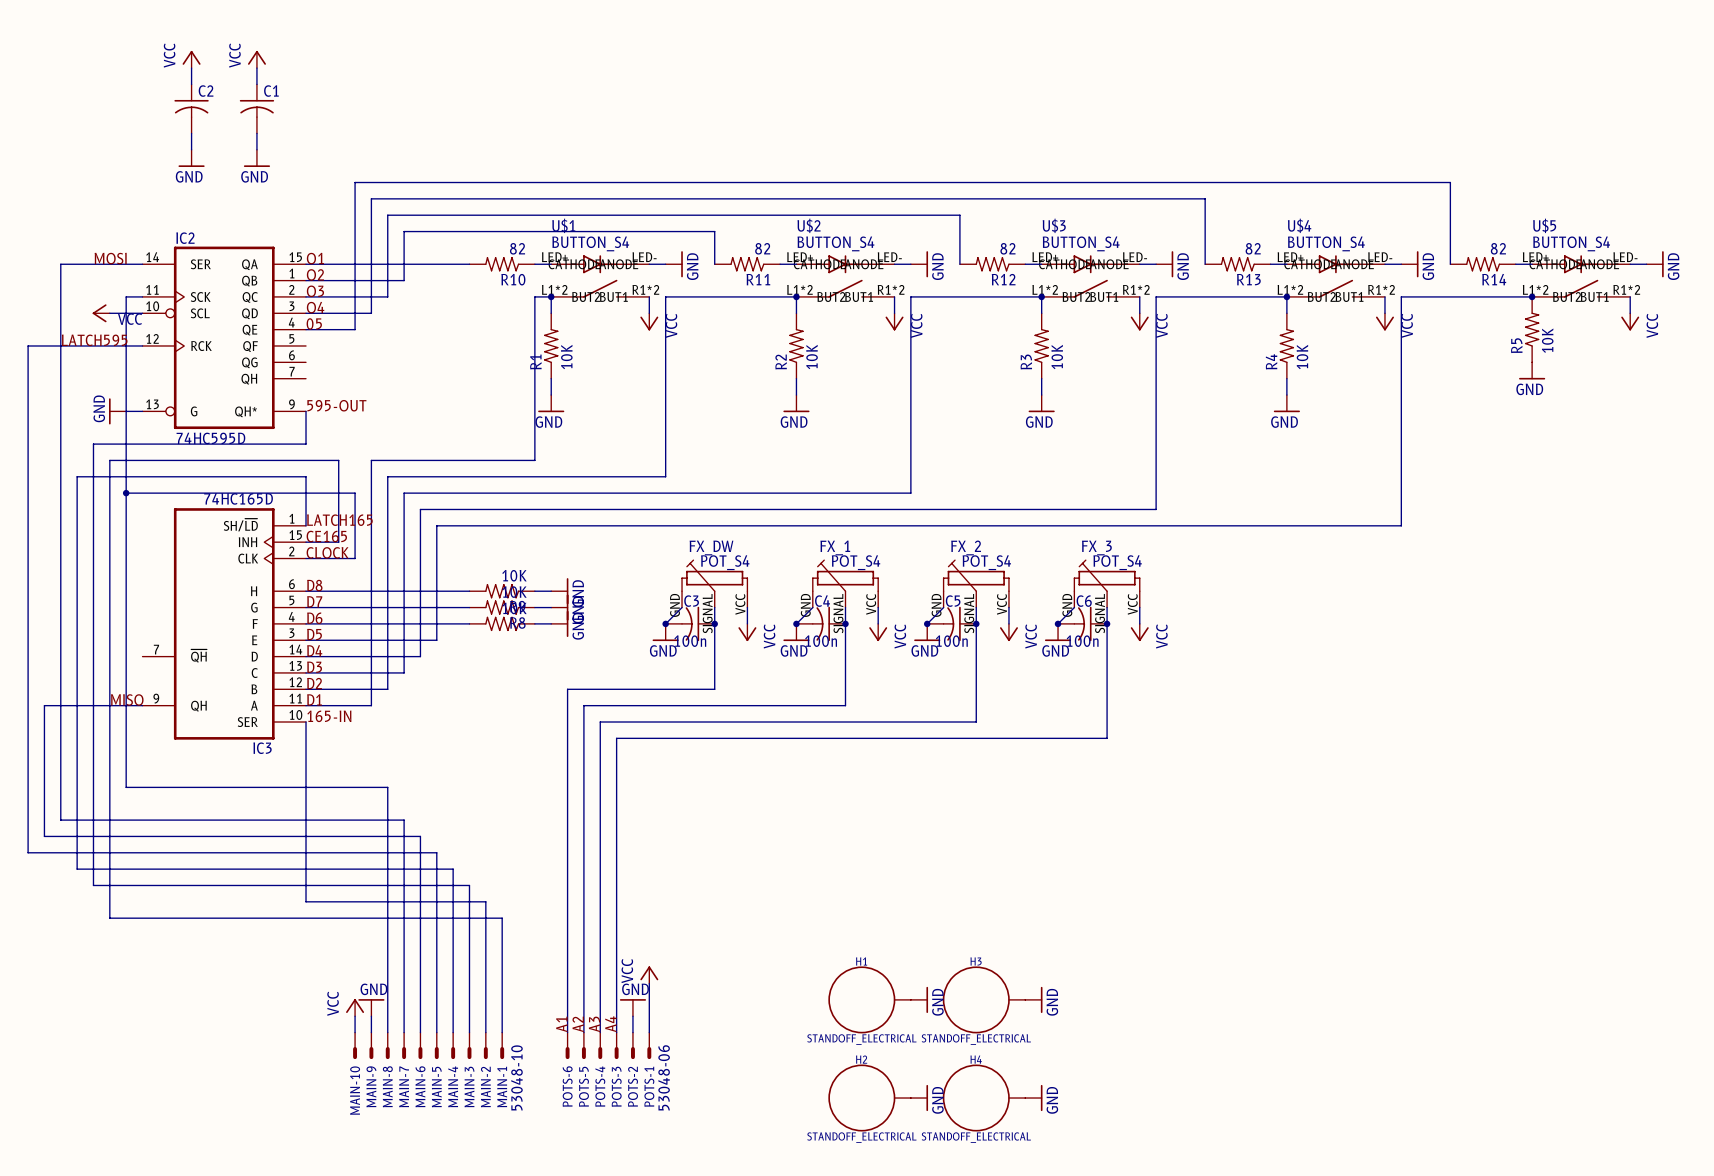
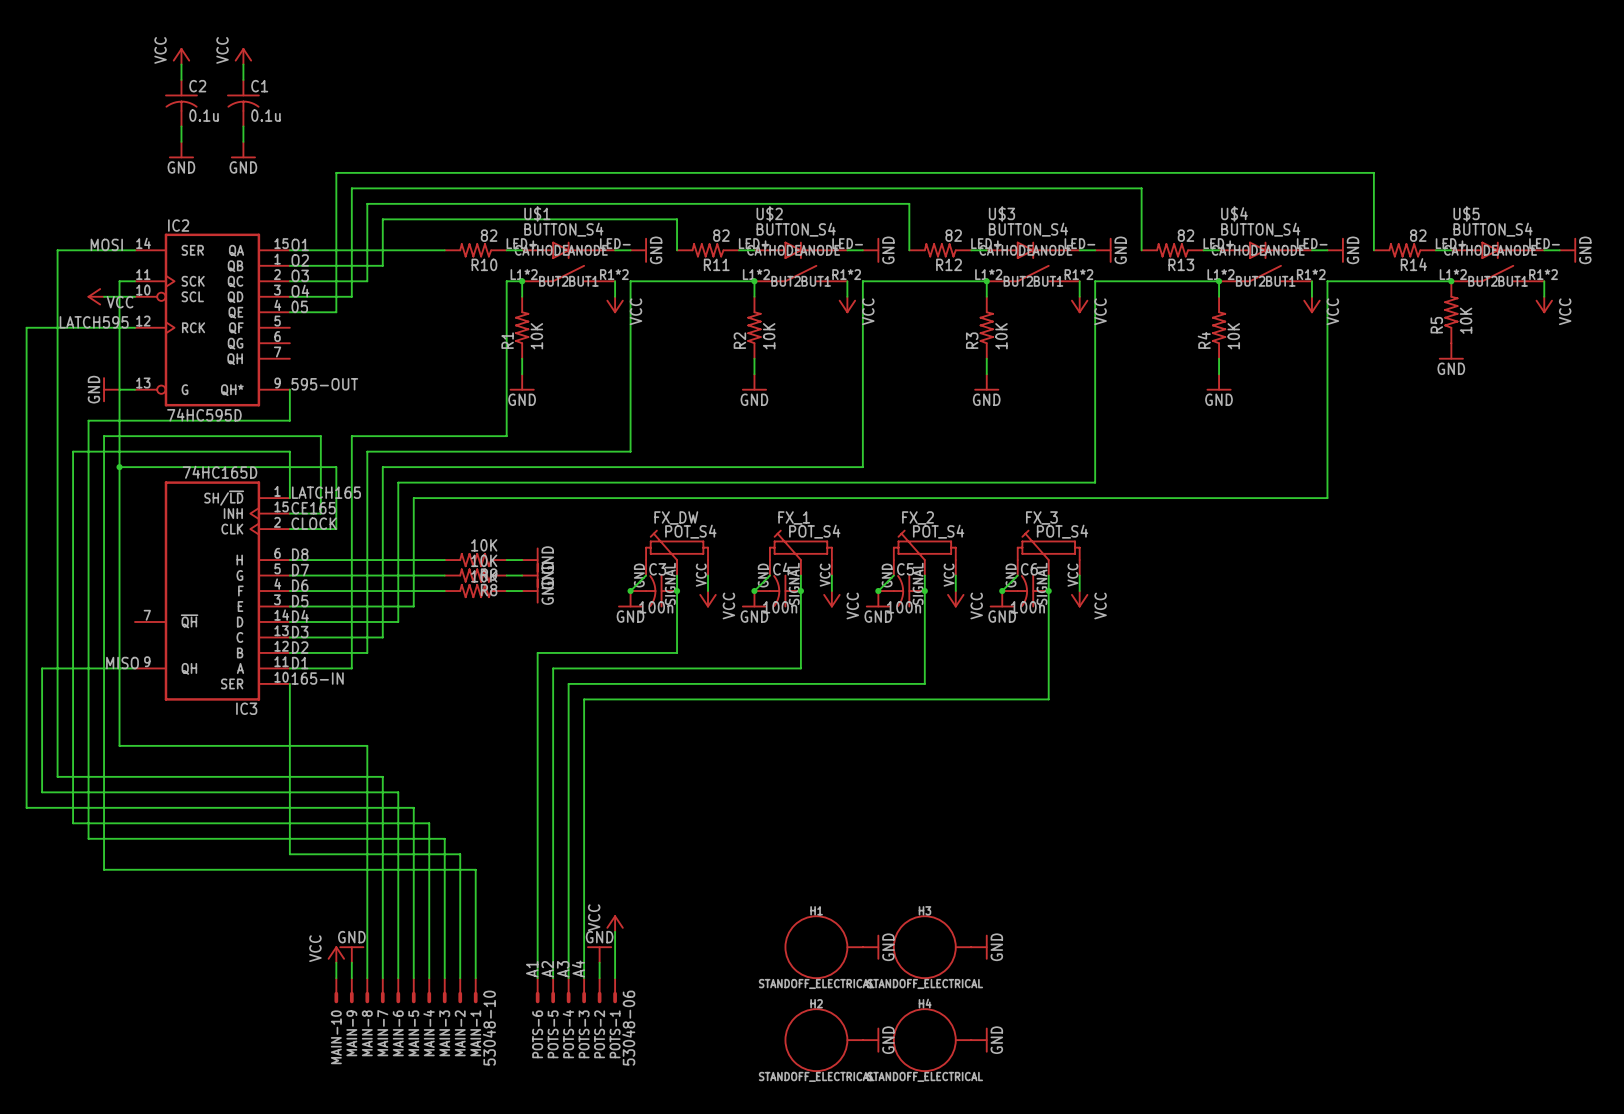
C2 value: none -> 0.1u (204, 115)
C1 value: none -> 0.1u (265, 115)

